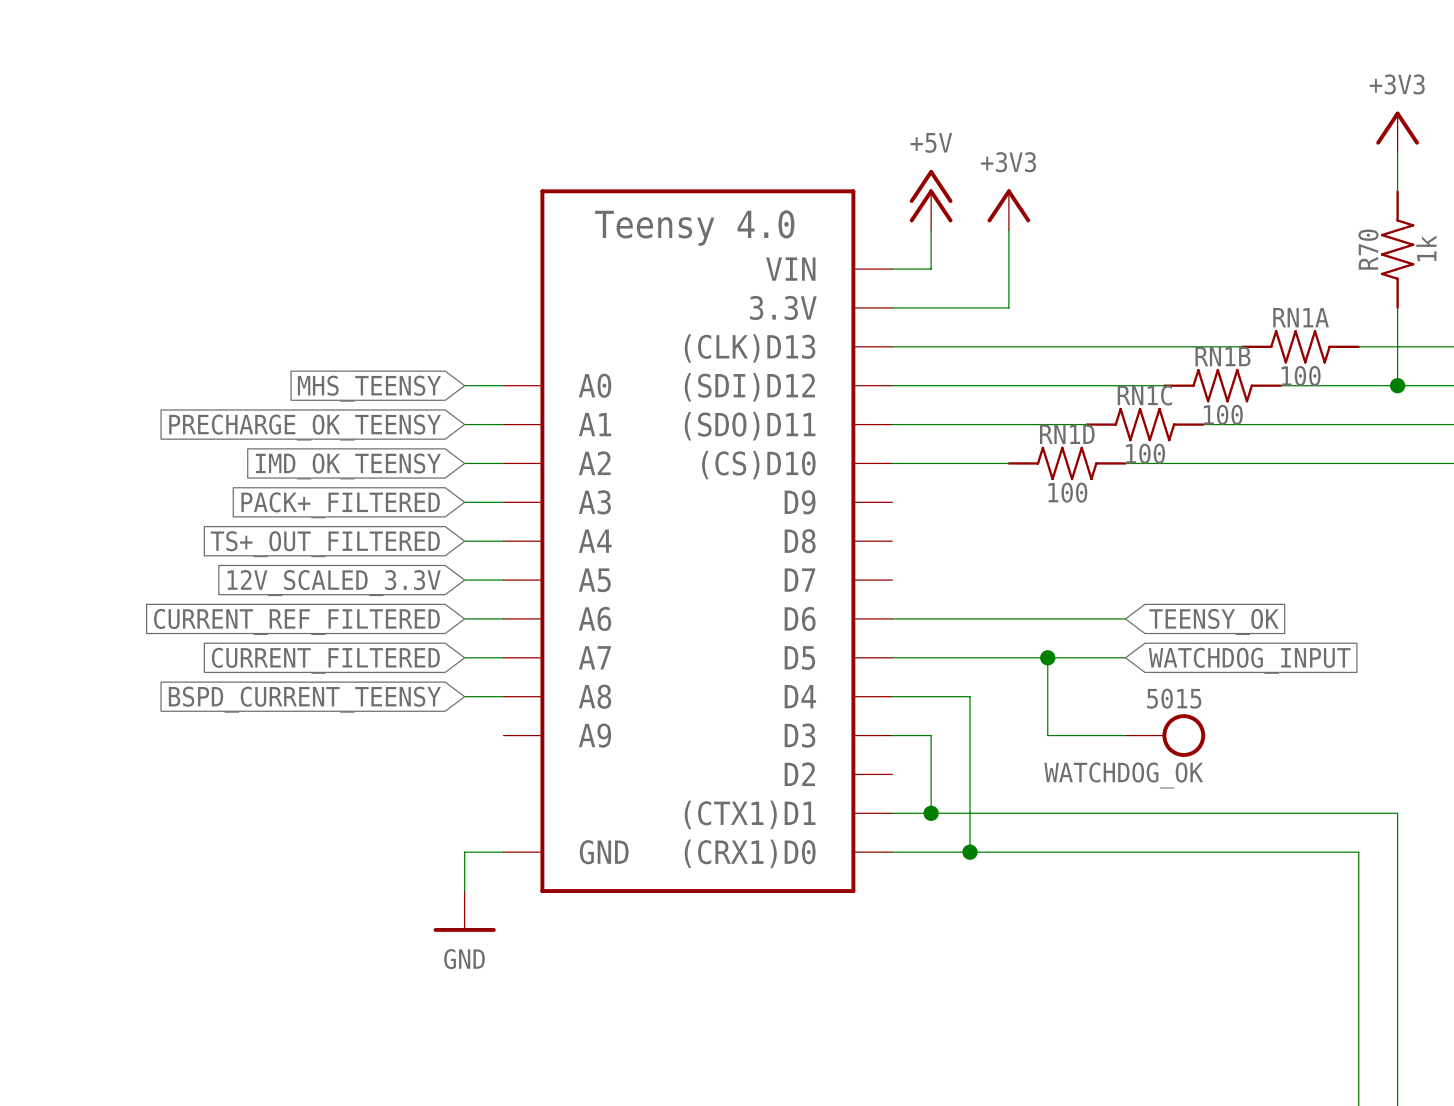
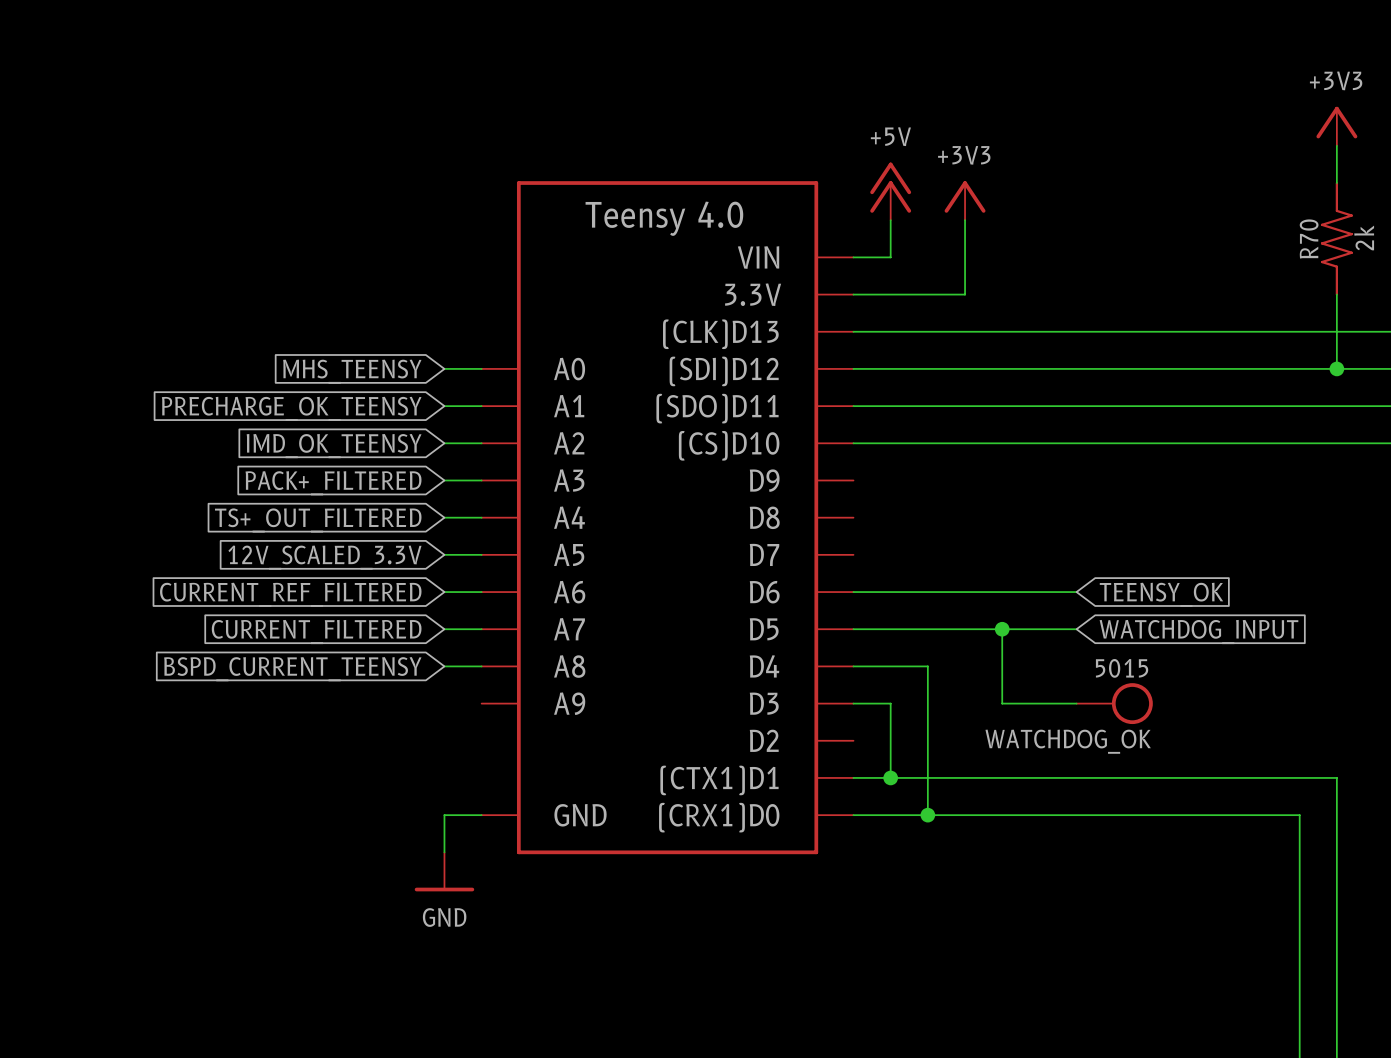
R70 text: 1k (1426, 248) -> 2k (1364, 237)
RN1A: (1300, 346) -> none
RN1B: (1222, 385) -> none
RN1C: (1144, 424) -> none
RN1D: (1067, 463) -> none

